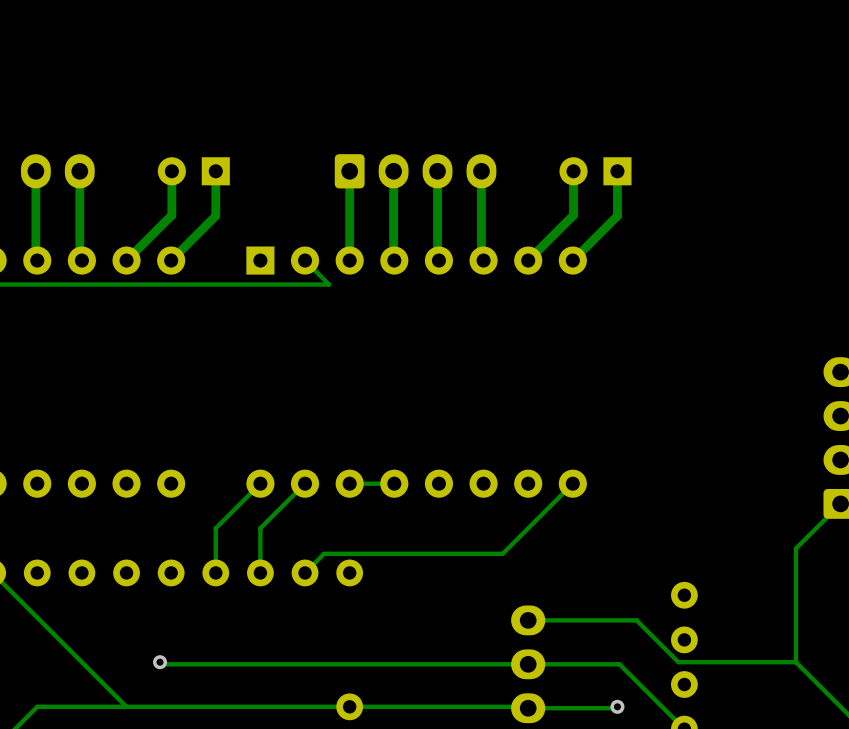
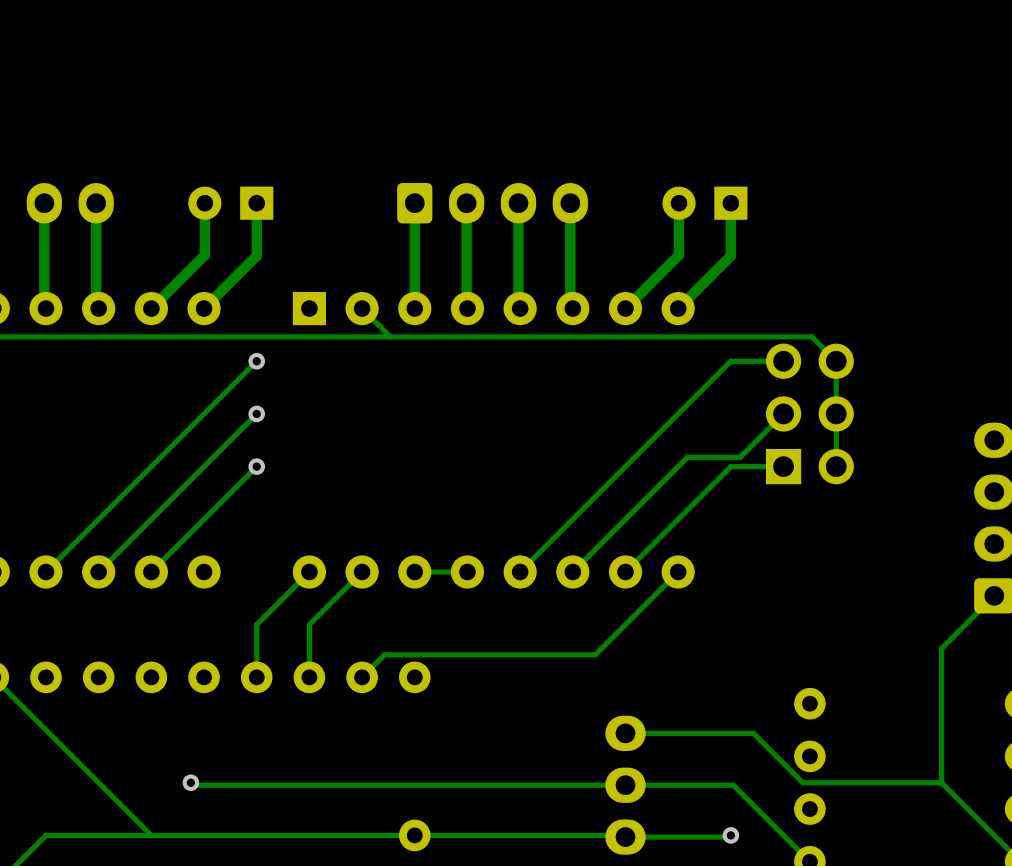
track: none -> (390, 336) (811, 336) (836, 361) (836, 466)
track: none -> (256, 361) (45, 571)
via: none -> (256, 361)
track: none -> (783, 361) (730, 361) (520, 571)
track: none -> (256, 413) (98, 571)
via: none -> (256, 413)
track: none -> (783, 413) (740, 457) (687, 457) (572, 571)
part: none -> (809, 413)
track: none -> (256, 466) (151, 571)
via: none -> (256, 466)
track: none -> (783, 466) (730, 466) (625, 571)

